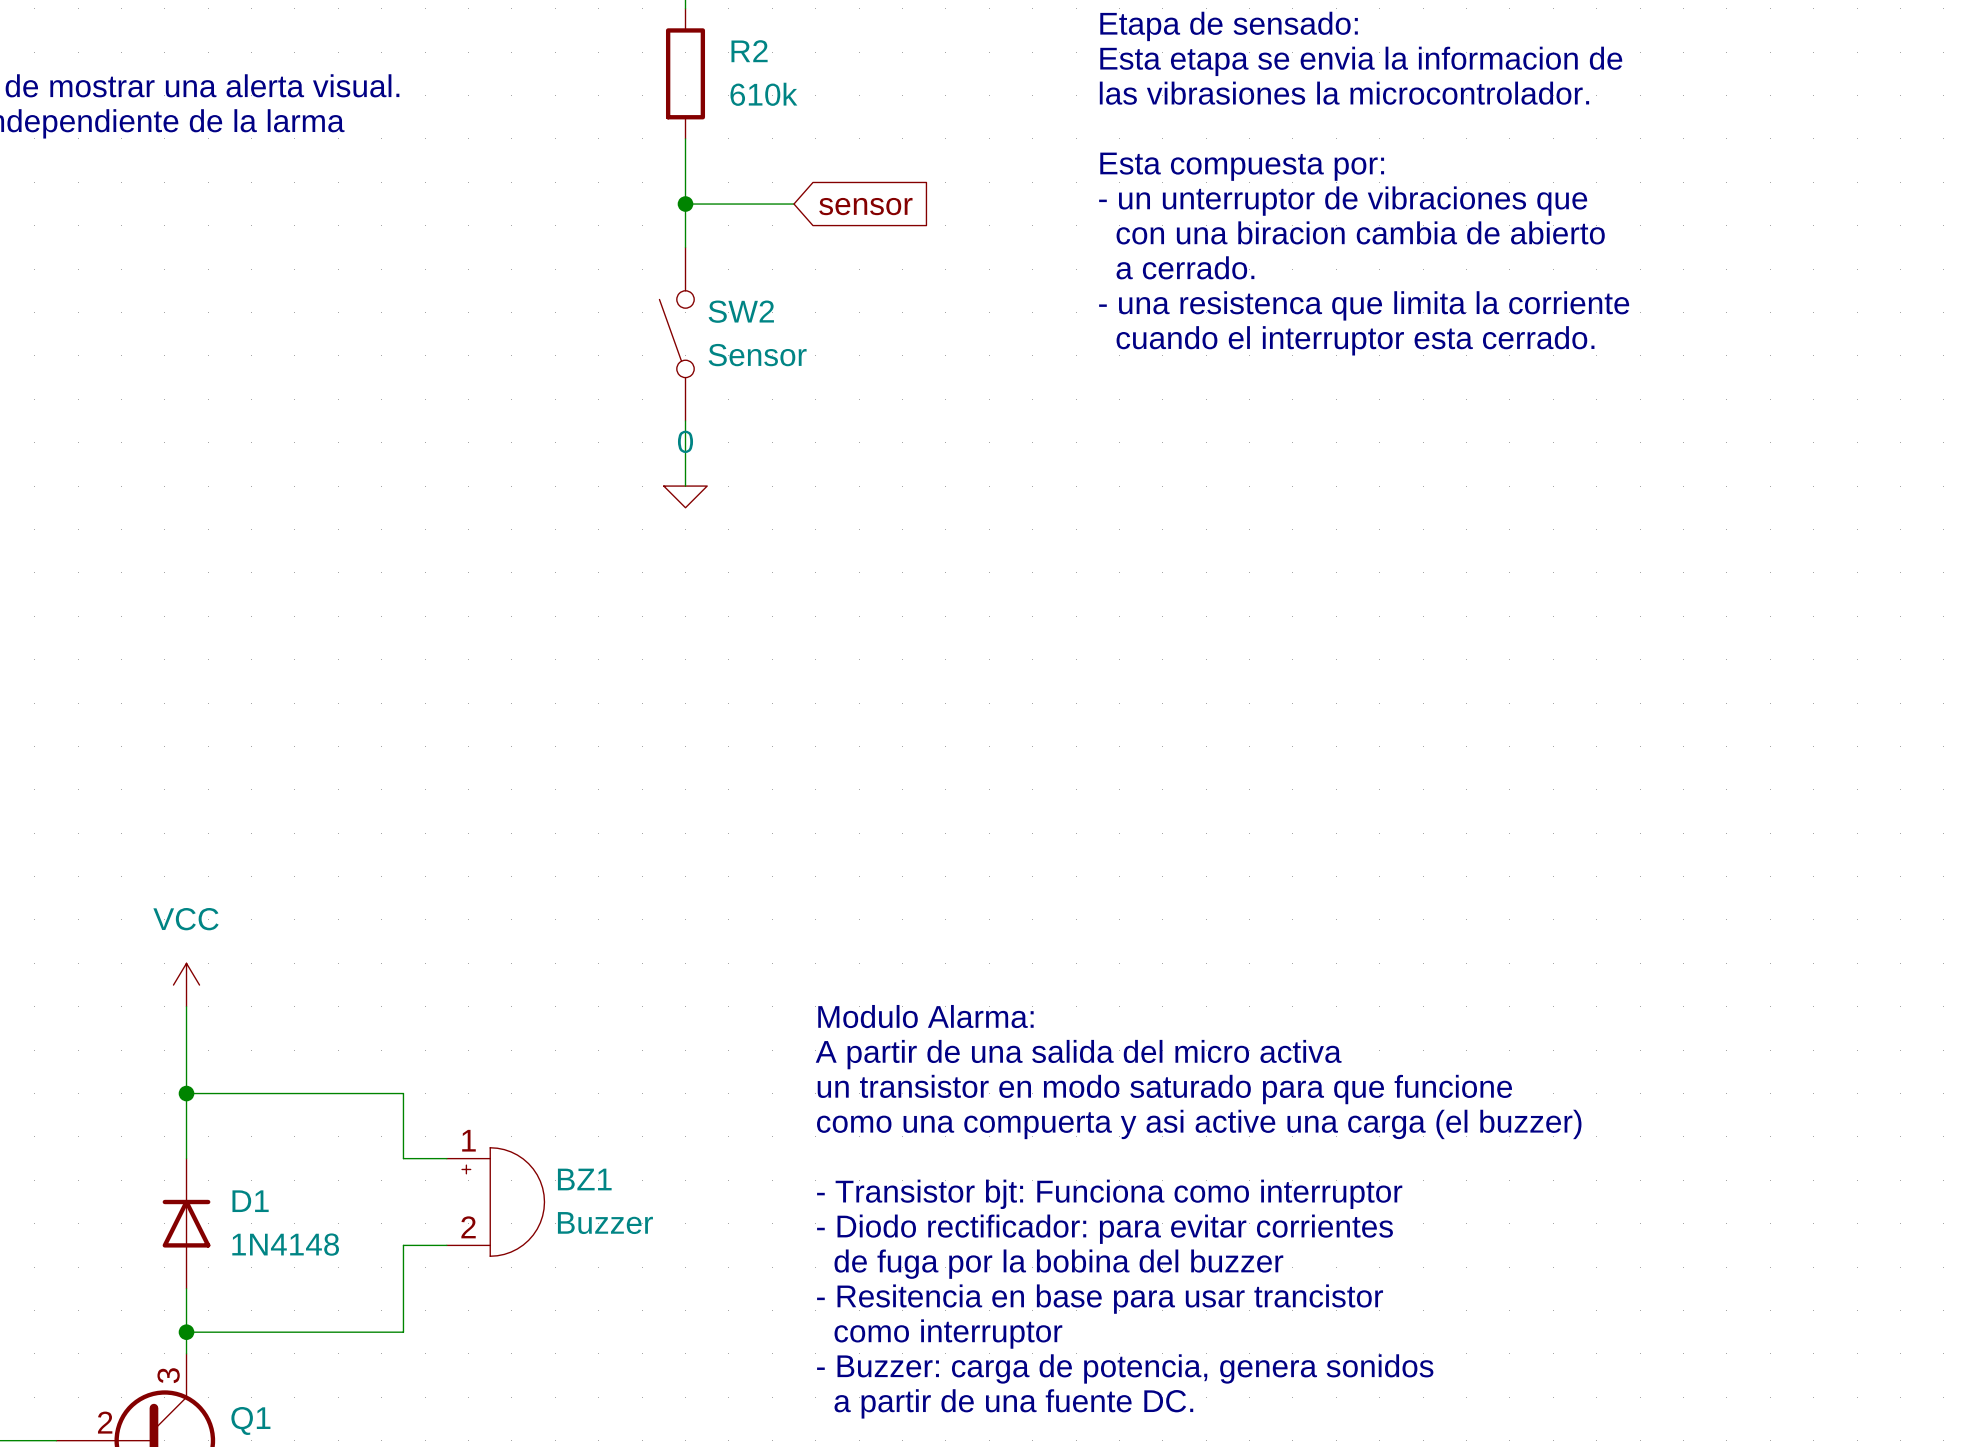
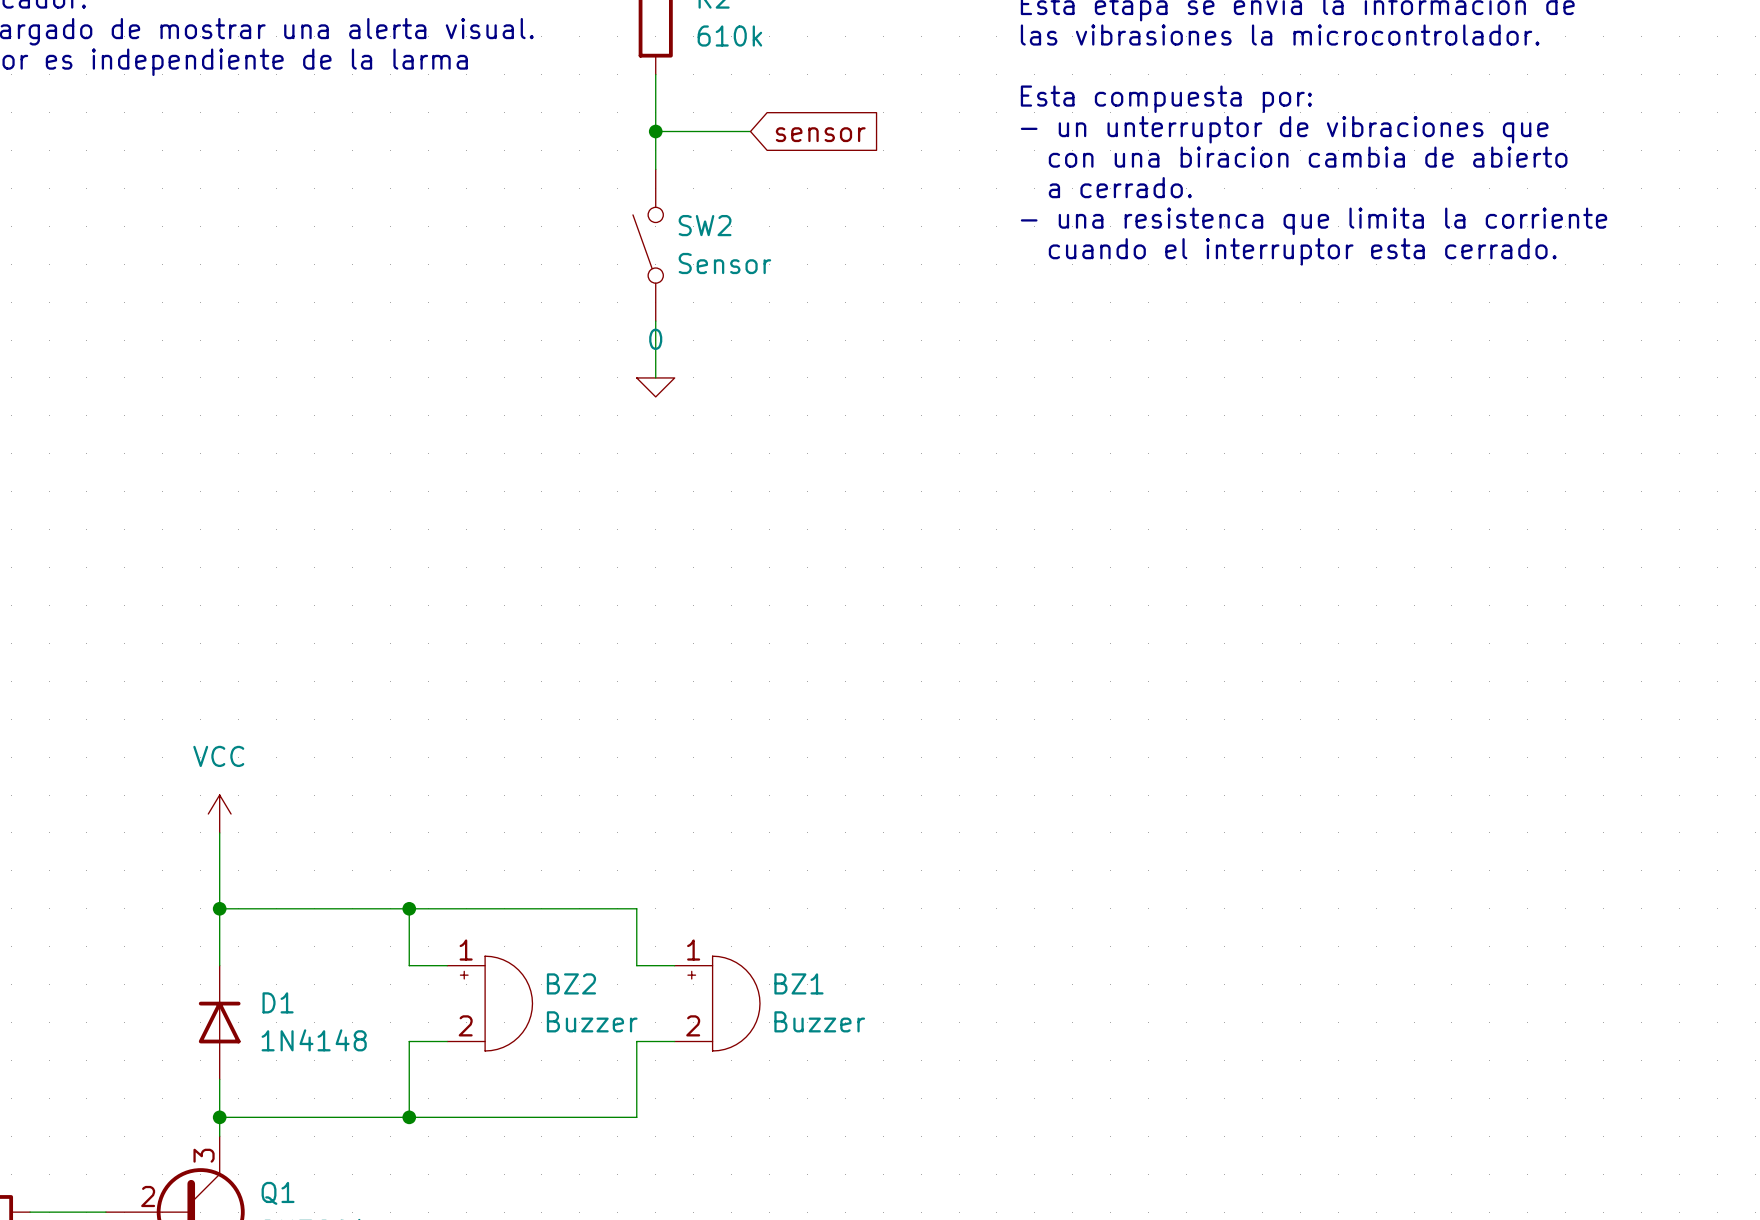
text: Modulo Alarma: (925, 1016) -> none
text: A partir de una salida del micro activa (1078, 1054) -> none
text: un transistor en modo saturado para que funcione (1164, 1089) -> none
wire: none -> (409, 908) (636, 908) (636, 965) (674, 965)
junction: none -> (409, 908)
text: como una compuerta y asi active una carga (el buzzer) (1199, 1124) -> none
BZ1 name: BZ1 (584, 1179) -> BZ2 (571, 983)
text: - Transistor bjt: Funciona como interruptor (1109, 1194) -> none
BZ1: none -> Buzzer (717, 1003)
text: - Diodo rectificador: para evitar corrientes (1105, 1229) -> none
wire: none -> (674, 1041) (636, 1041) (636, 1117) (409, 1117)
text: de fuga por la bobina del buzzer (1058, 1264) -> none
text: - Resitencia en base para usar trancistor (1100, 1299) -> none
junction: none -> (409, 1117)
text: como interruptor (948, 1334) -> none
text: - Buzzer: carga de potencia, genera sonidos (1125, 1368) -> none
text: a partir de una fuente DC. (1013, 1403) -> none

